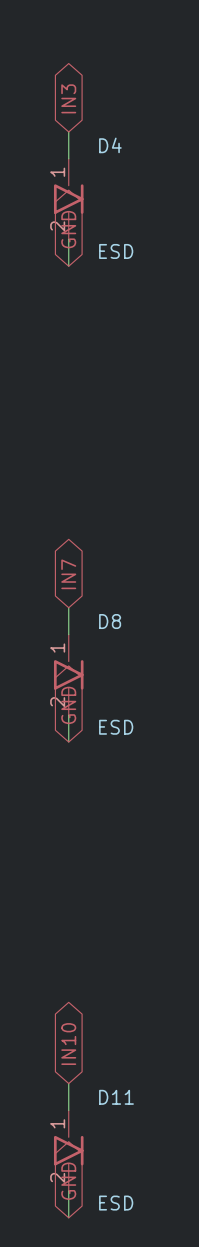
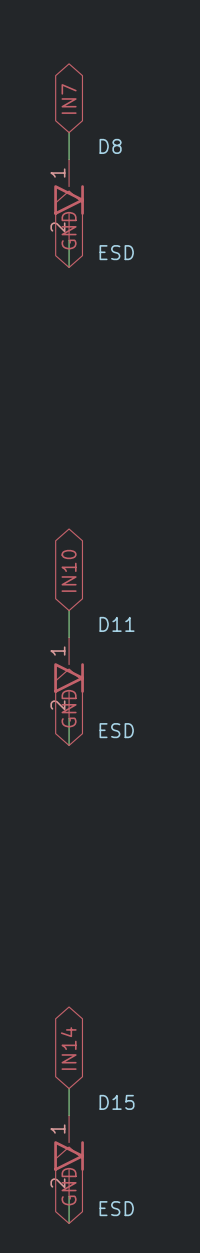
global label: IN3 (68, 98) -> IN7 (69, 98)
D4 name: D4 (110, 145) -> D8 (110, 146)
global label: IN7 (68, 574) -> IN10 (69, 570)
D8 name: D8 (110, 621) -> D11 (117, 624)
global label: IN10 (68, 1044) -> IN14 (68, 1048)
D11 name: D11 (116, 1097) -> D15 (117, 1102)

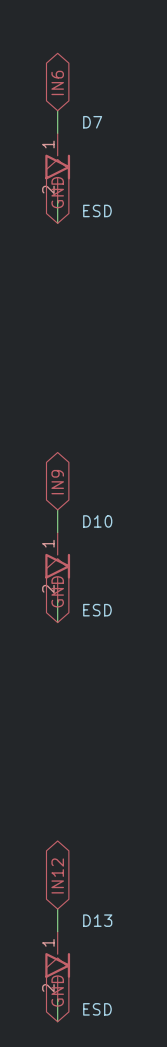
global label: IN7 (69, 98) -> IN6 (57, 82)
D8 name: D8 (110, 146) -> D7 (92, 122)
global label: IN10 (69, 570) -> IN9 (57, 482)
D11 name: D11 (117, 624) -> D10 (97, 521)
global label: IN14 (68, 1048) -> IN12 (57, 875)
D15 name: D15 (117, 1102) -> D13 (97, 920)

